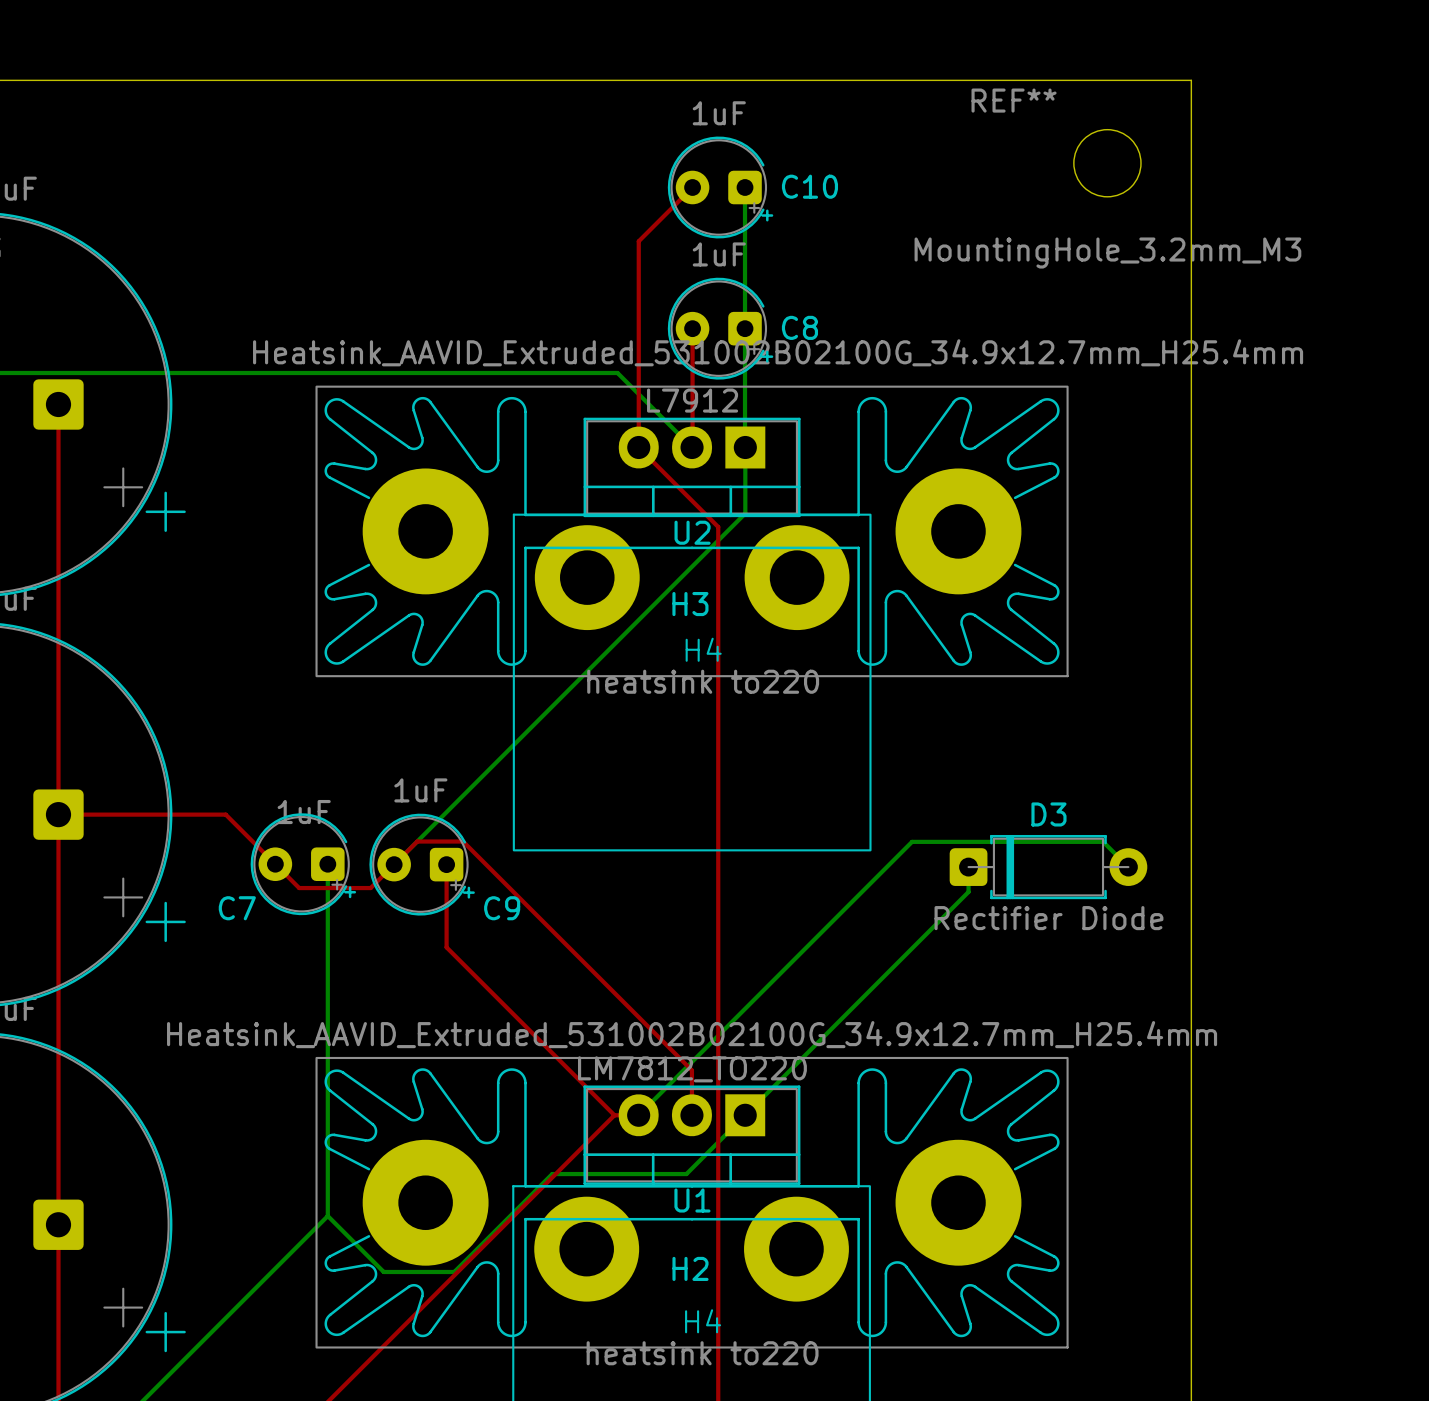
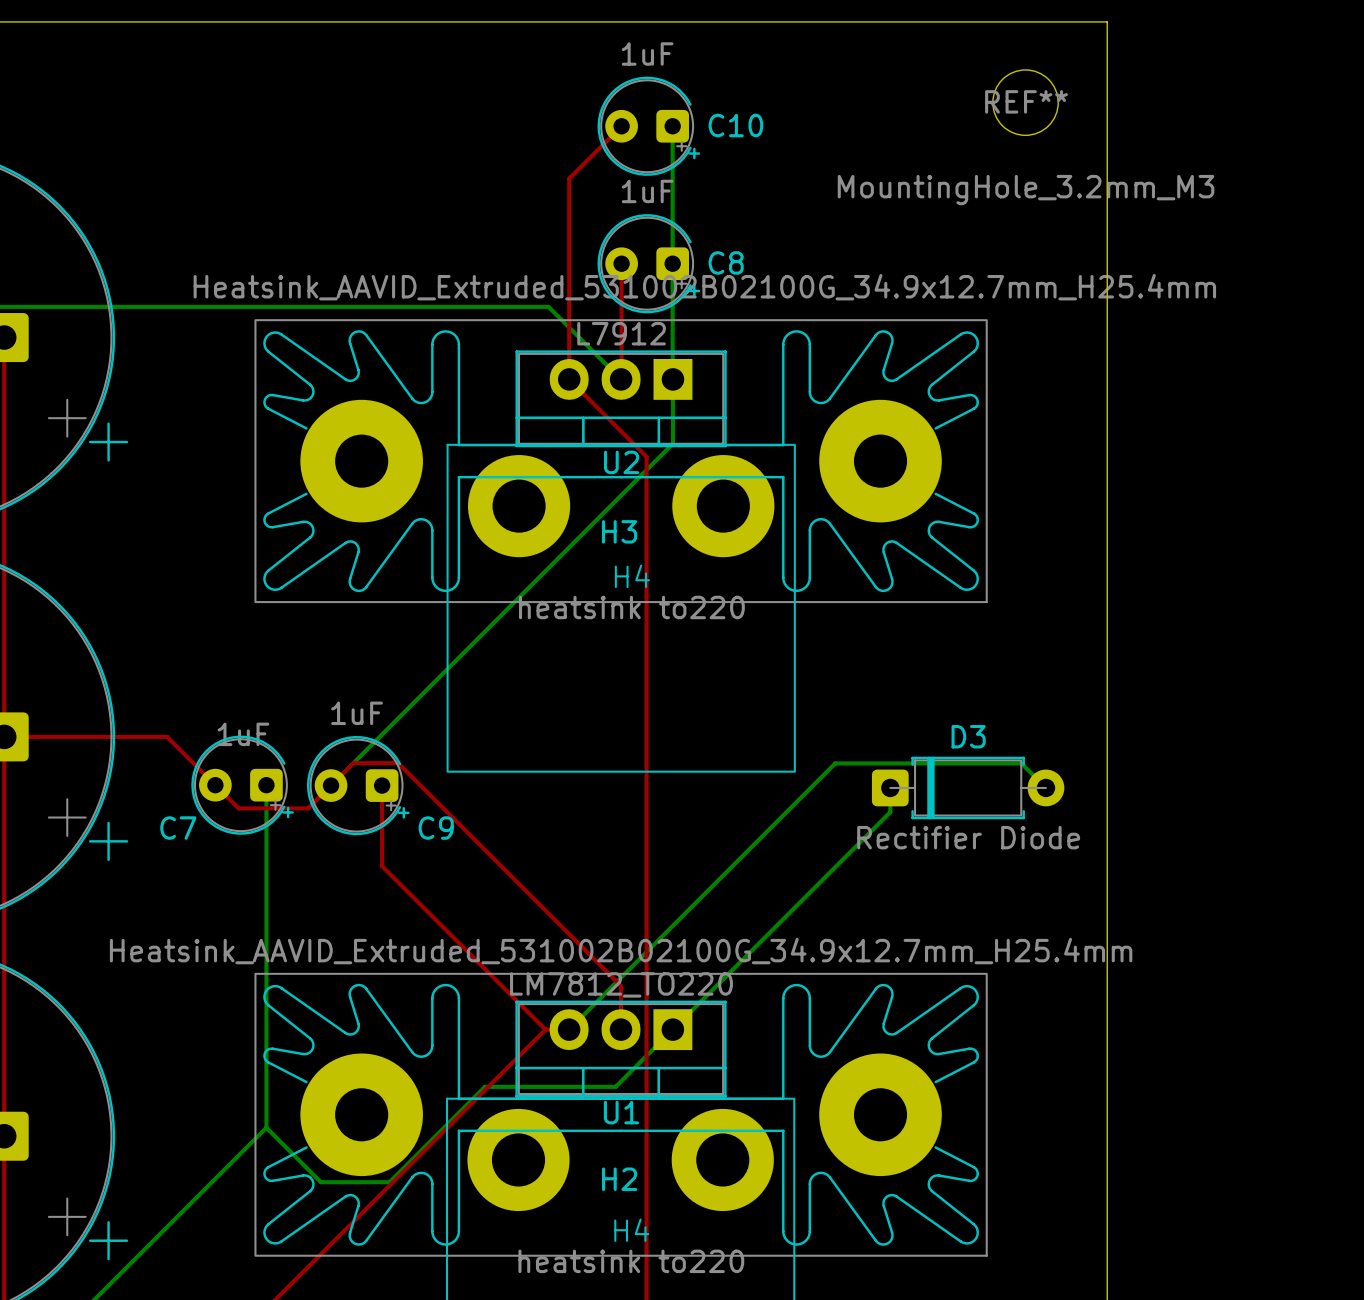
REF** name position: REF** (1014, 100) -> REF** (1026, 101)

